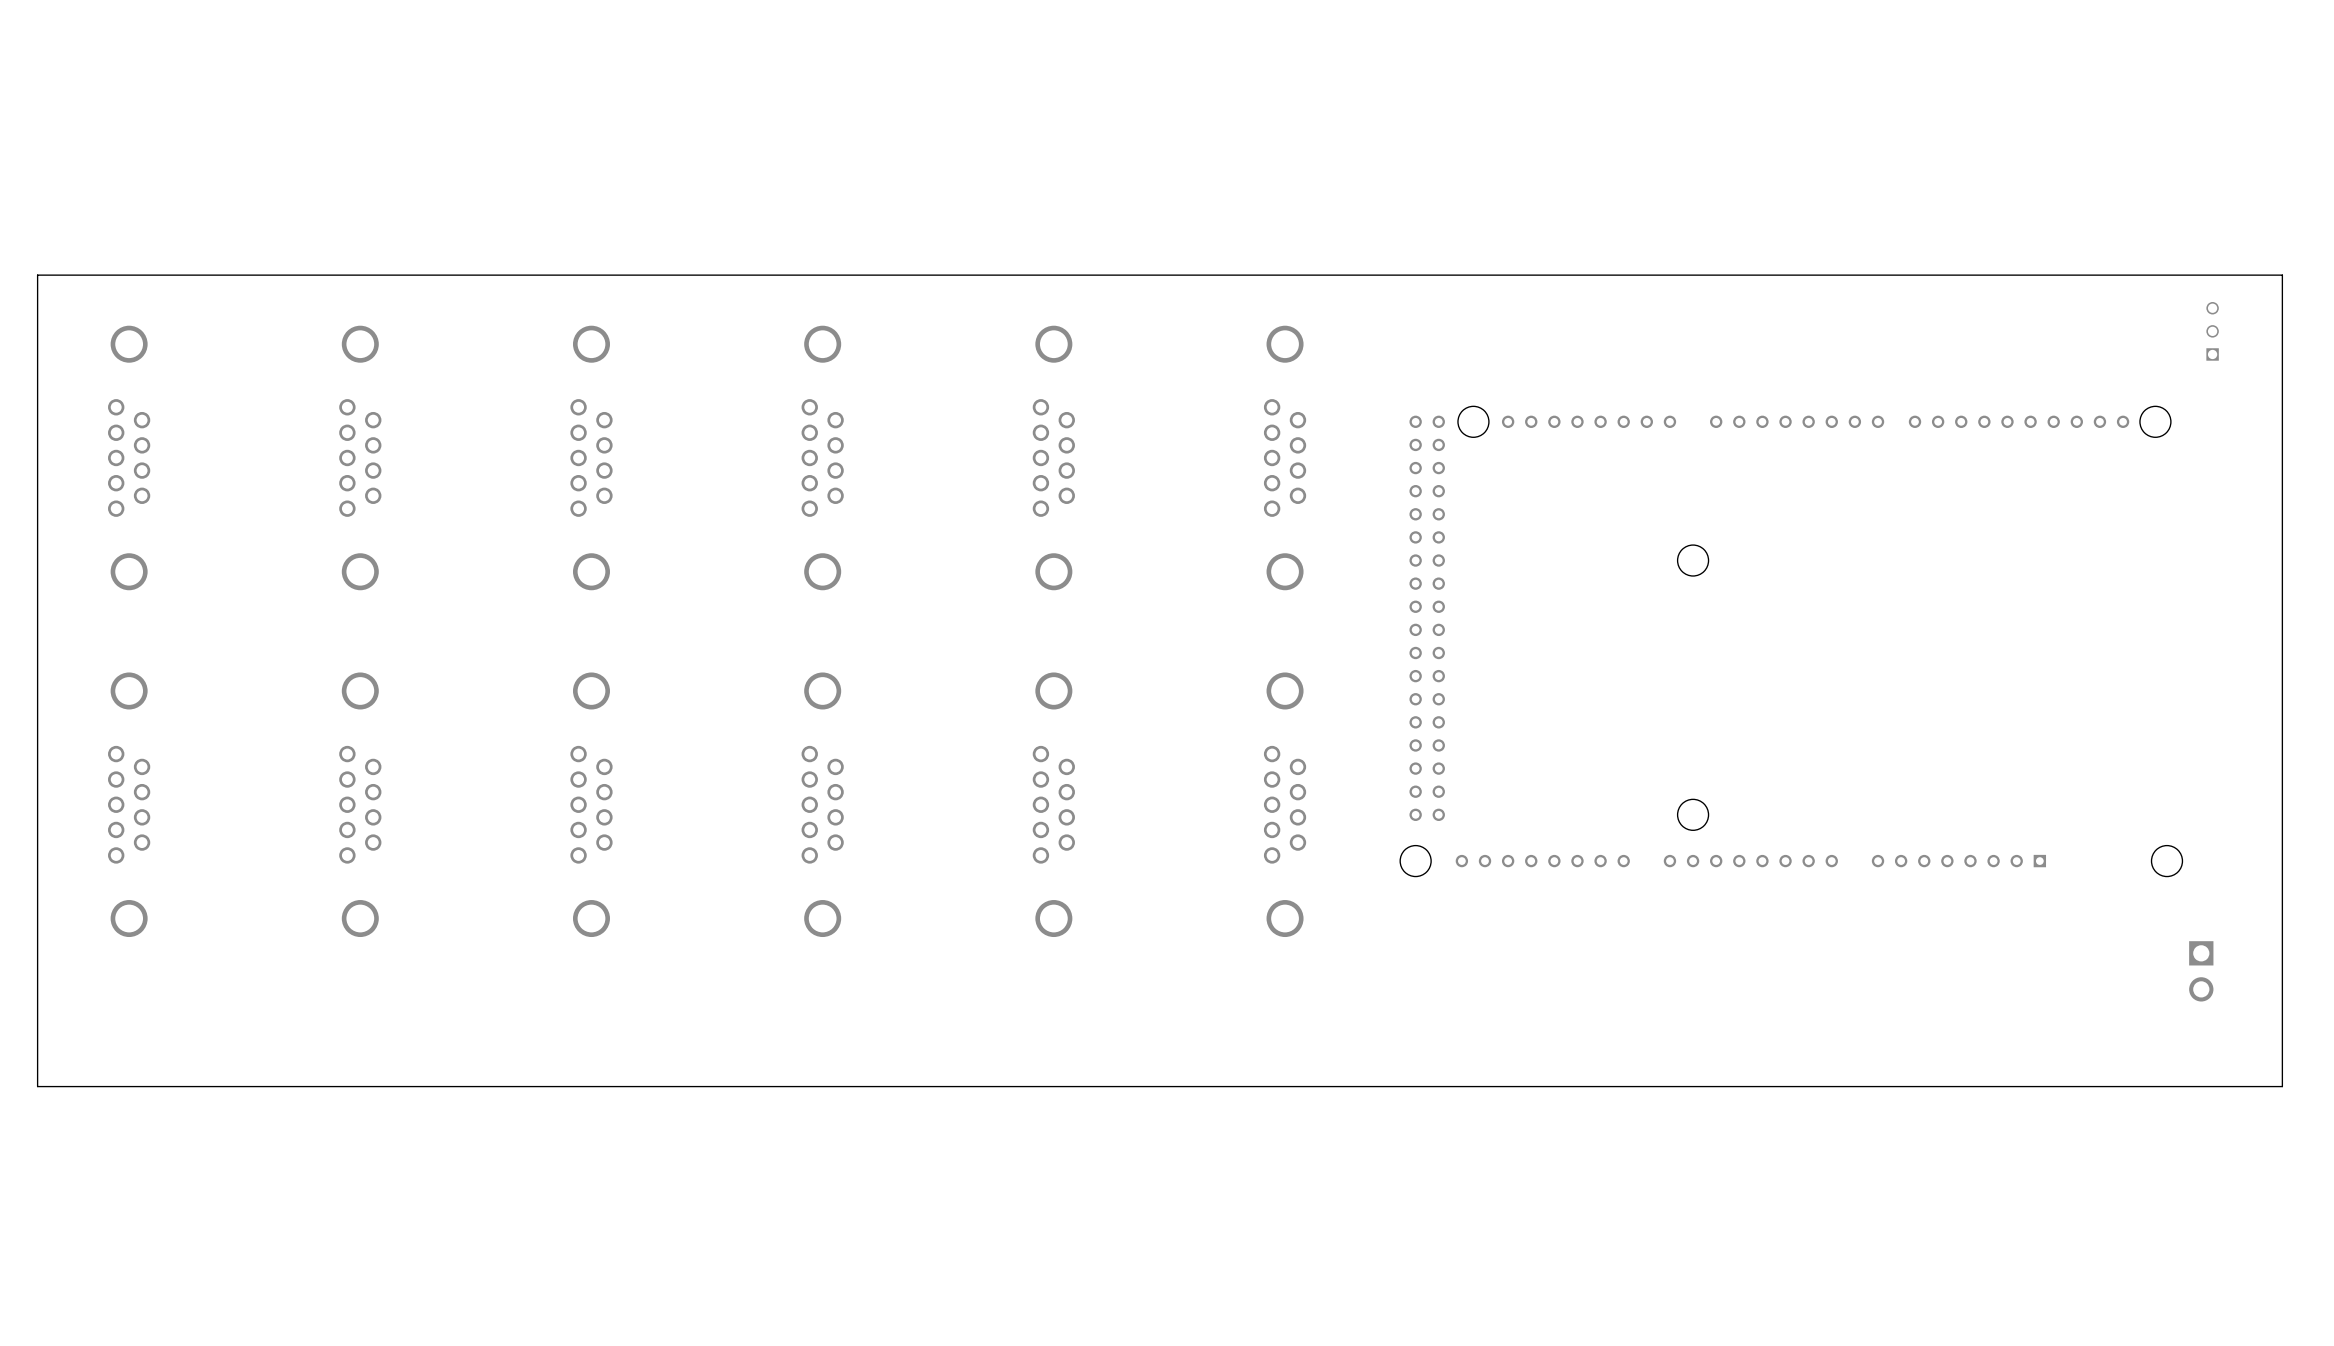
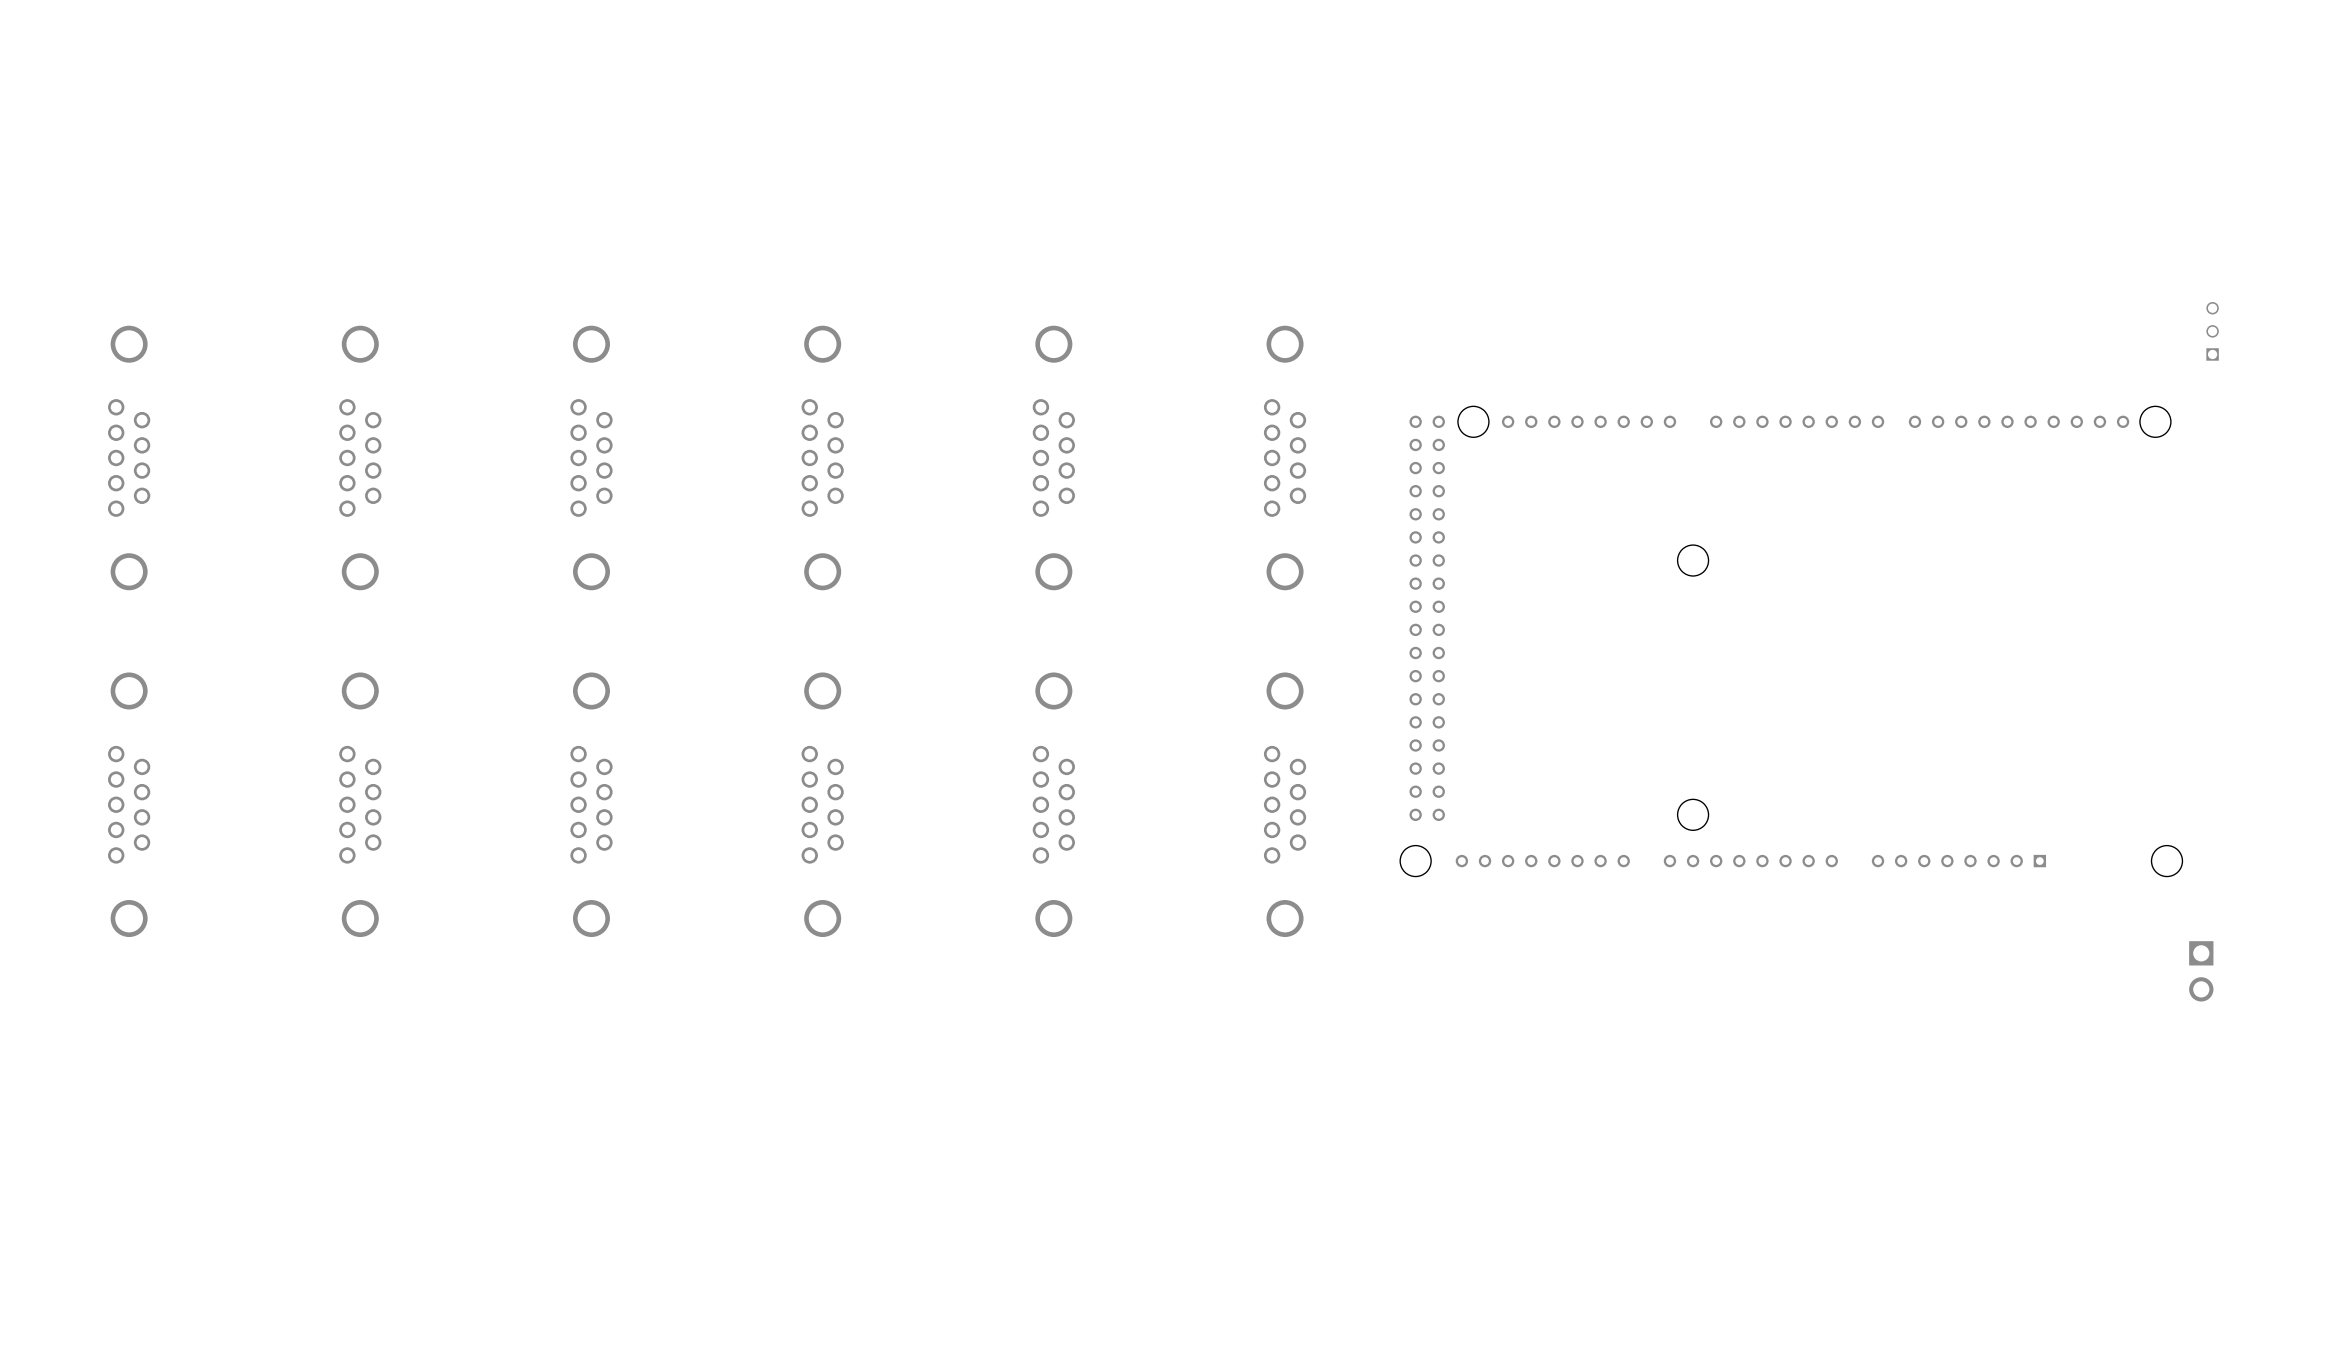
board edge: (2282, 275) (37, 275) (37, 1086) (2282, 1086) (2282, 275) -> none

